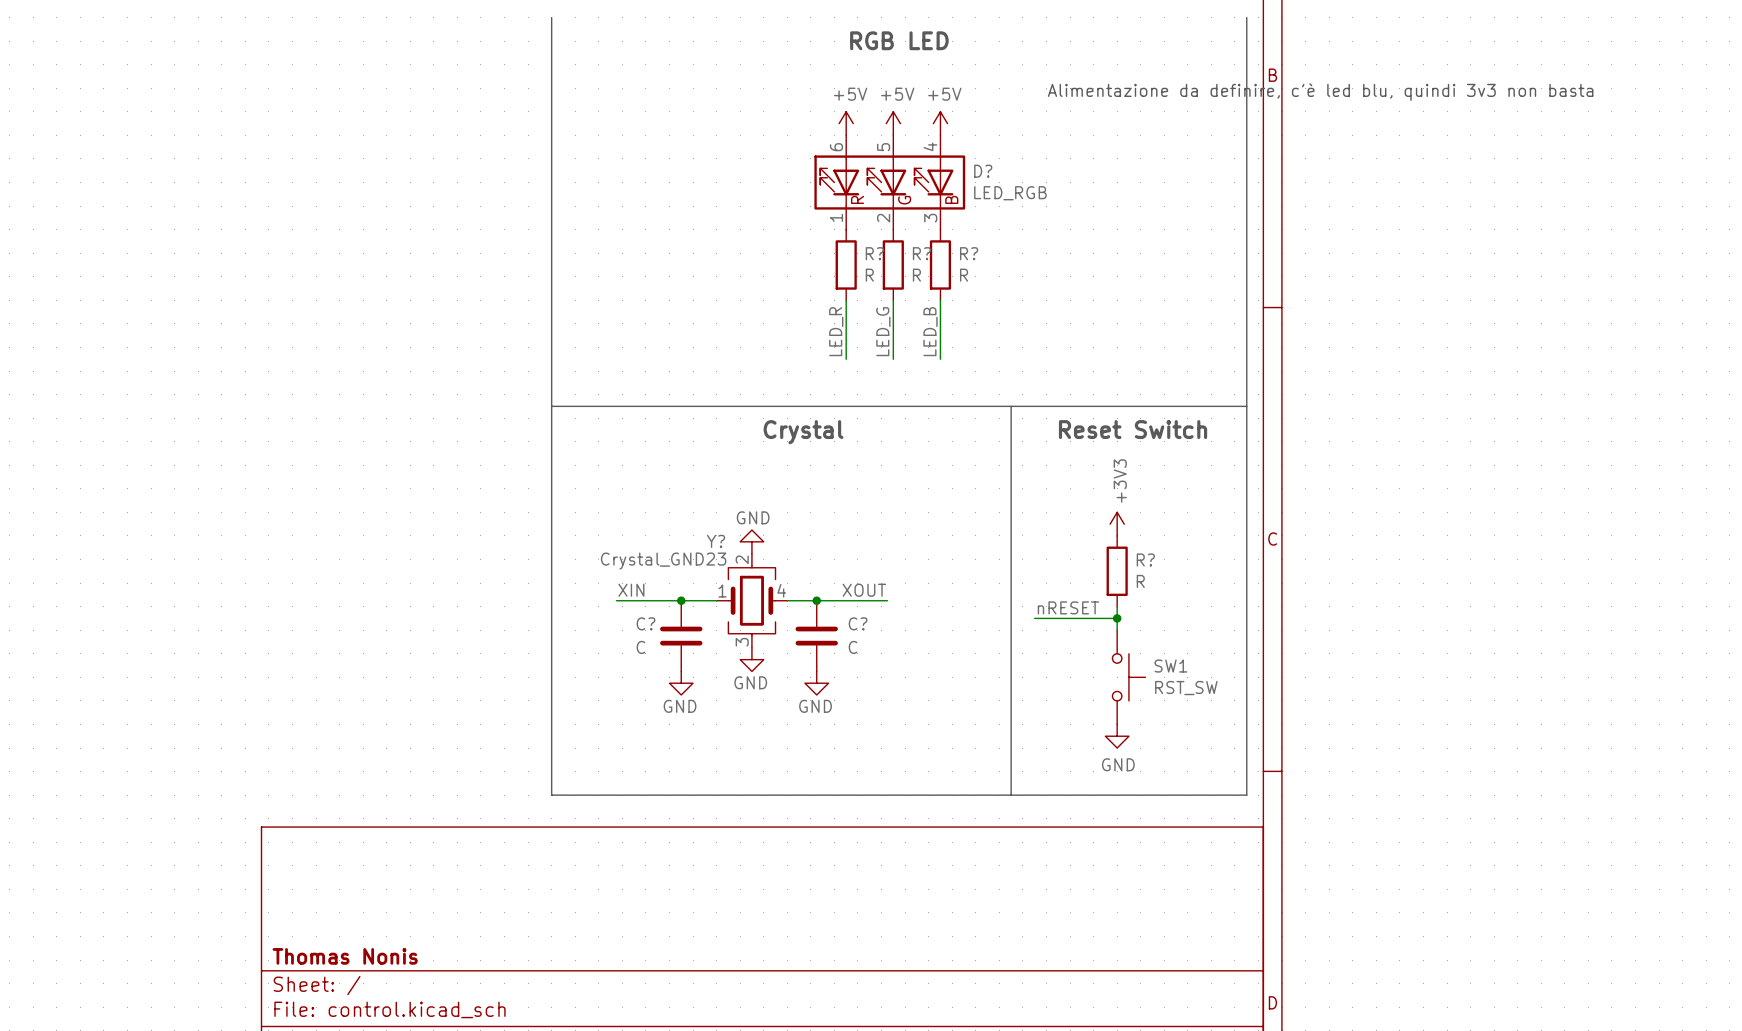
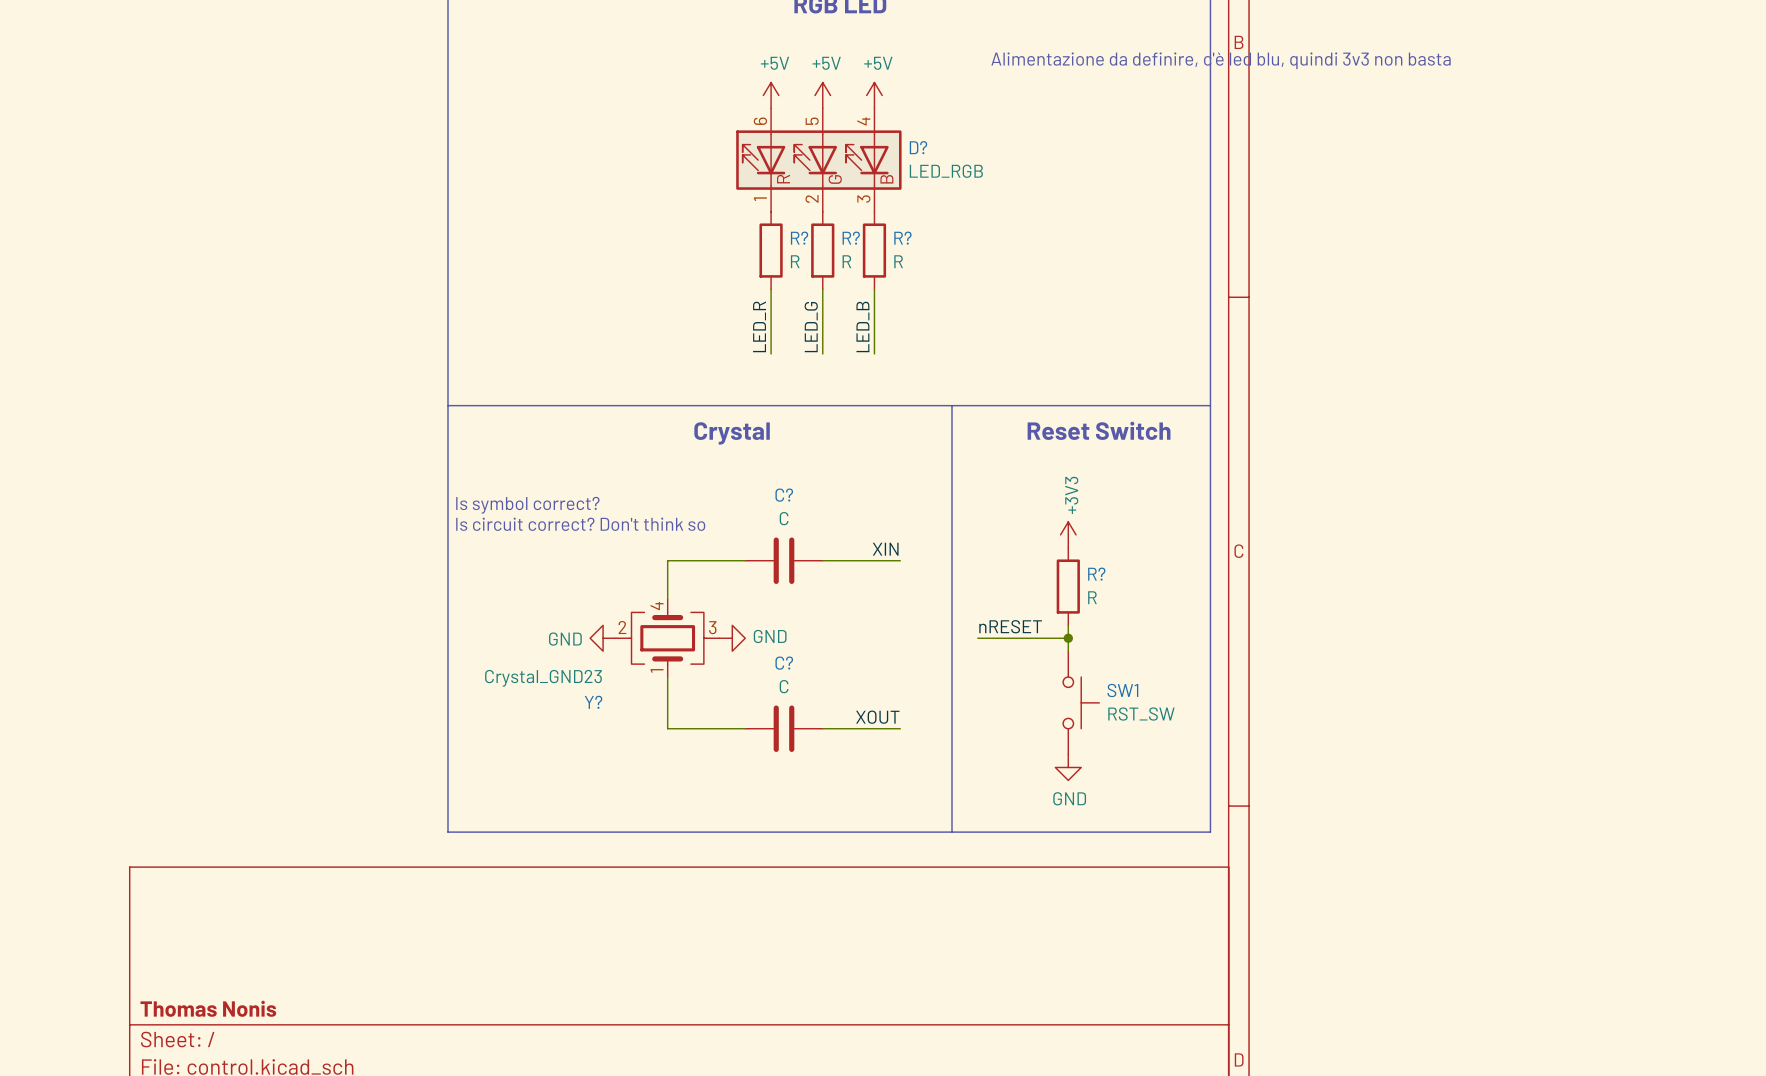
text: none -> Is symbol correct? (527, 505)
text: none -> Is circuit correct? Don't think so (580, 524)
label: none -> XIN (885, 549)
Y? name position: Y? (716, 541) -> Y? (593, 702)
power symbol: GND (751, 541) -> none
wire: none -> (745, 560) (667, 560) (667, 599)
C?: none -> C (783, 560)
wire: none -> (822, 560) (900, 560)
Y? value position: Crystal_GND23 (663, 561) -> Crystal_GND23 (543, 678)
label: XIN (631, 590) -> none
label position: XOUT (864, 590) -> XOUT (877, 717)
wire: (616, 600) (716, 600) -> none
junction: (681, 600) -> none
Y? rotation: 0° (751, 600) -> 90° counterclockwise (667, 638)
wire: (787, 600) (887, 600) -> none
junction: (816, 600) -> none
power symbol: none -> GND (603, 638)
power symbol: none -> GND (732, 638)
C?: C (681, 636) -> none
C?: C (816, 636) -> none
wire: none -> (667, 677) (667, 728) (745, 728)
power symbol: GND (751, 659) -> none
power symbol: GND (681, 683) -> none
power symbol: GND (816, 683) -> none
C?: none -> C (783, 728)
wire: none -> (822, 728) (900, 728)

